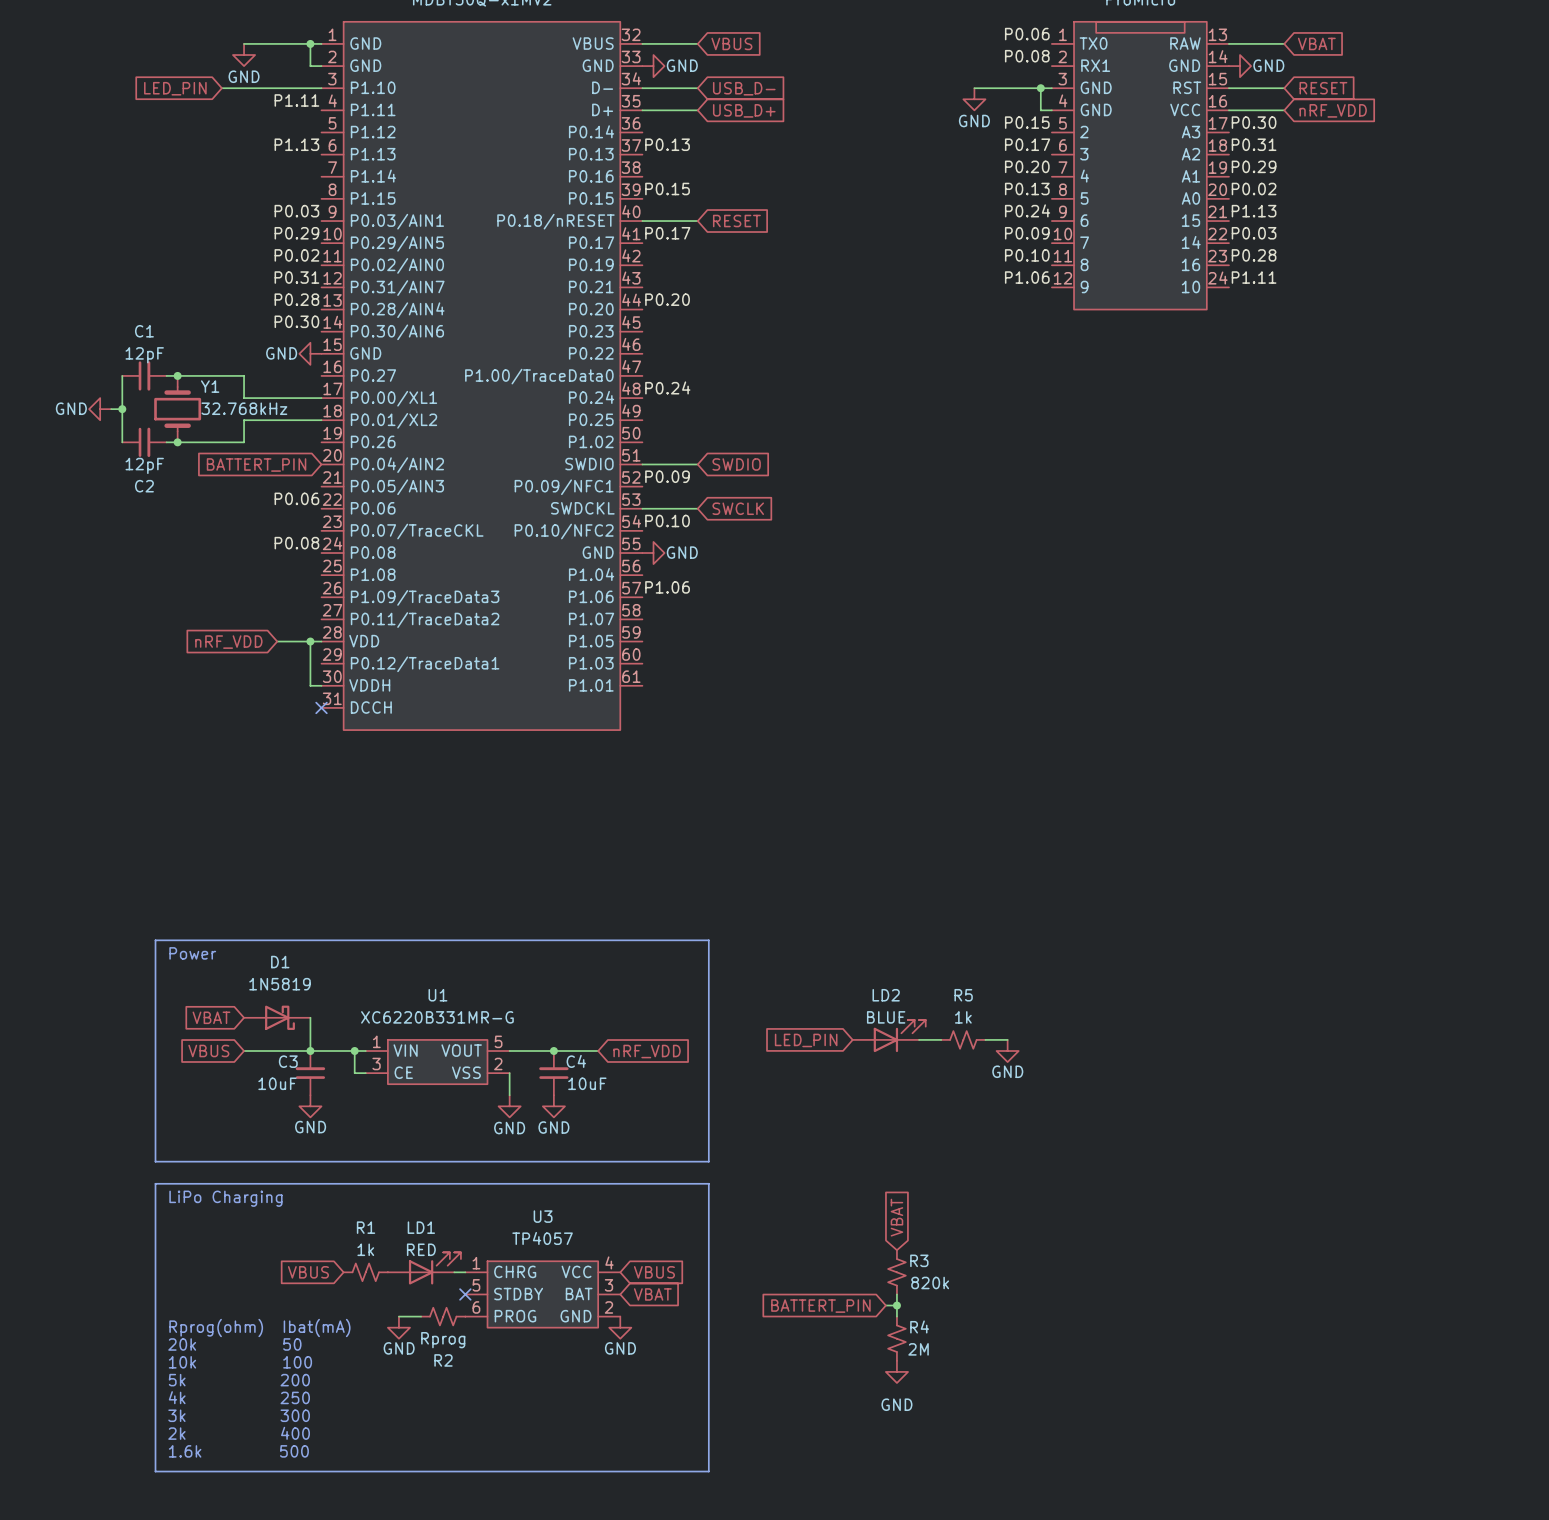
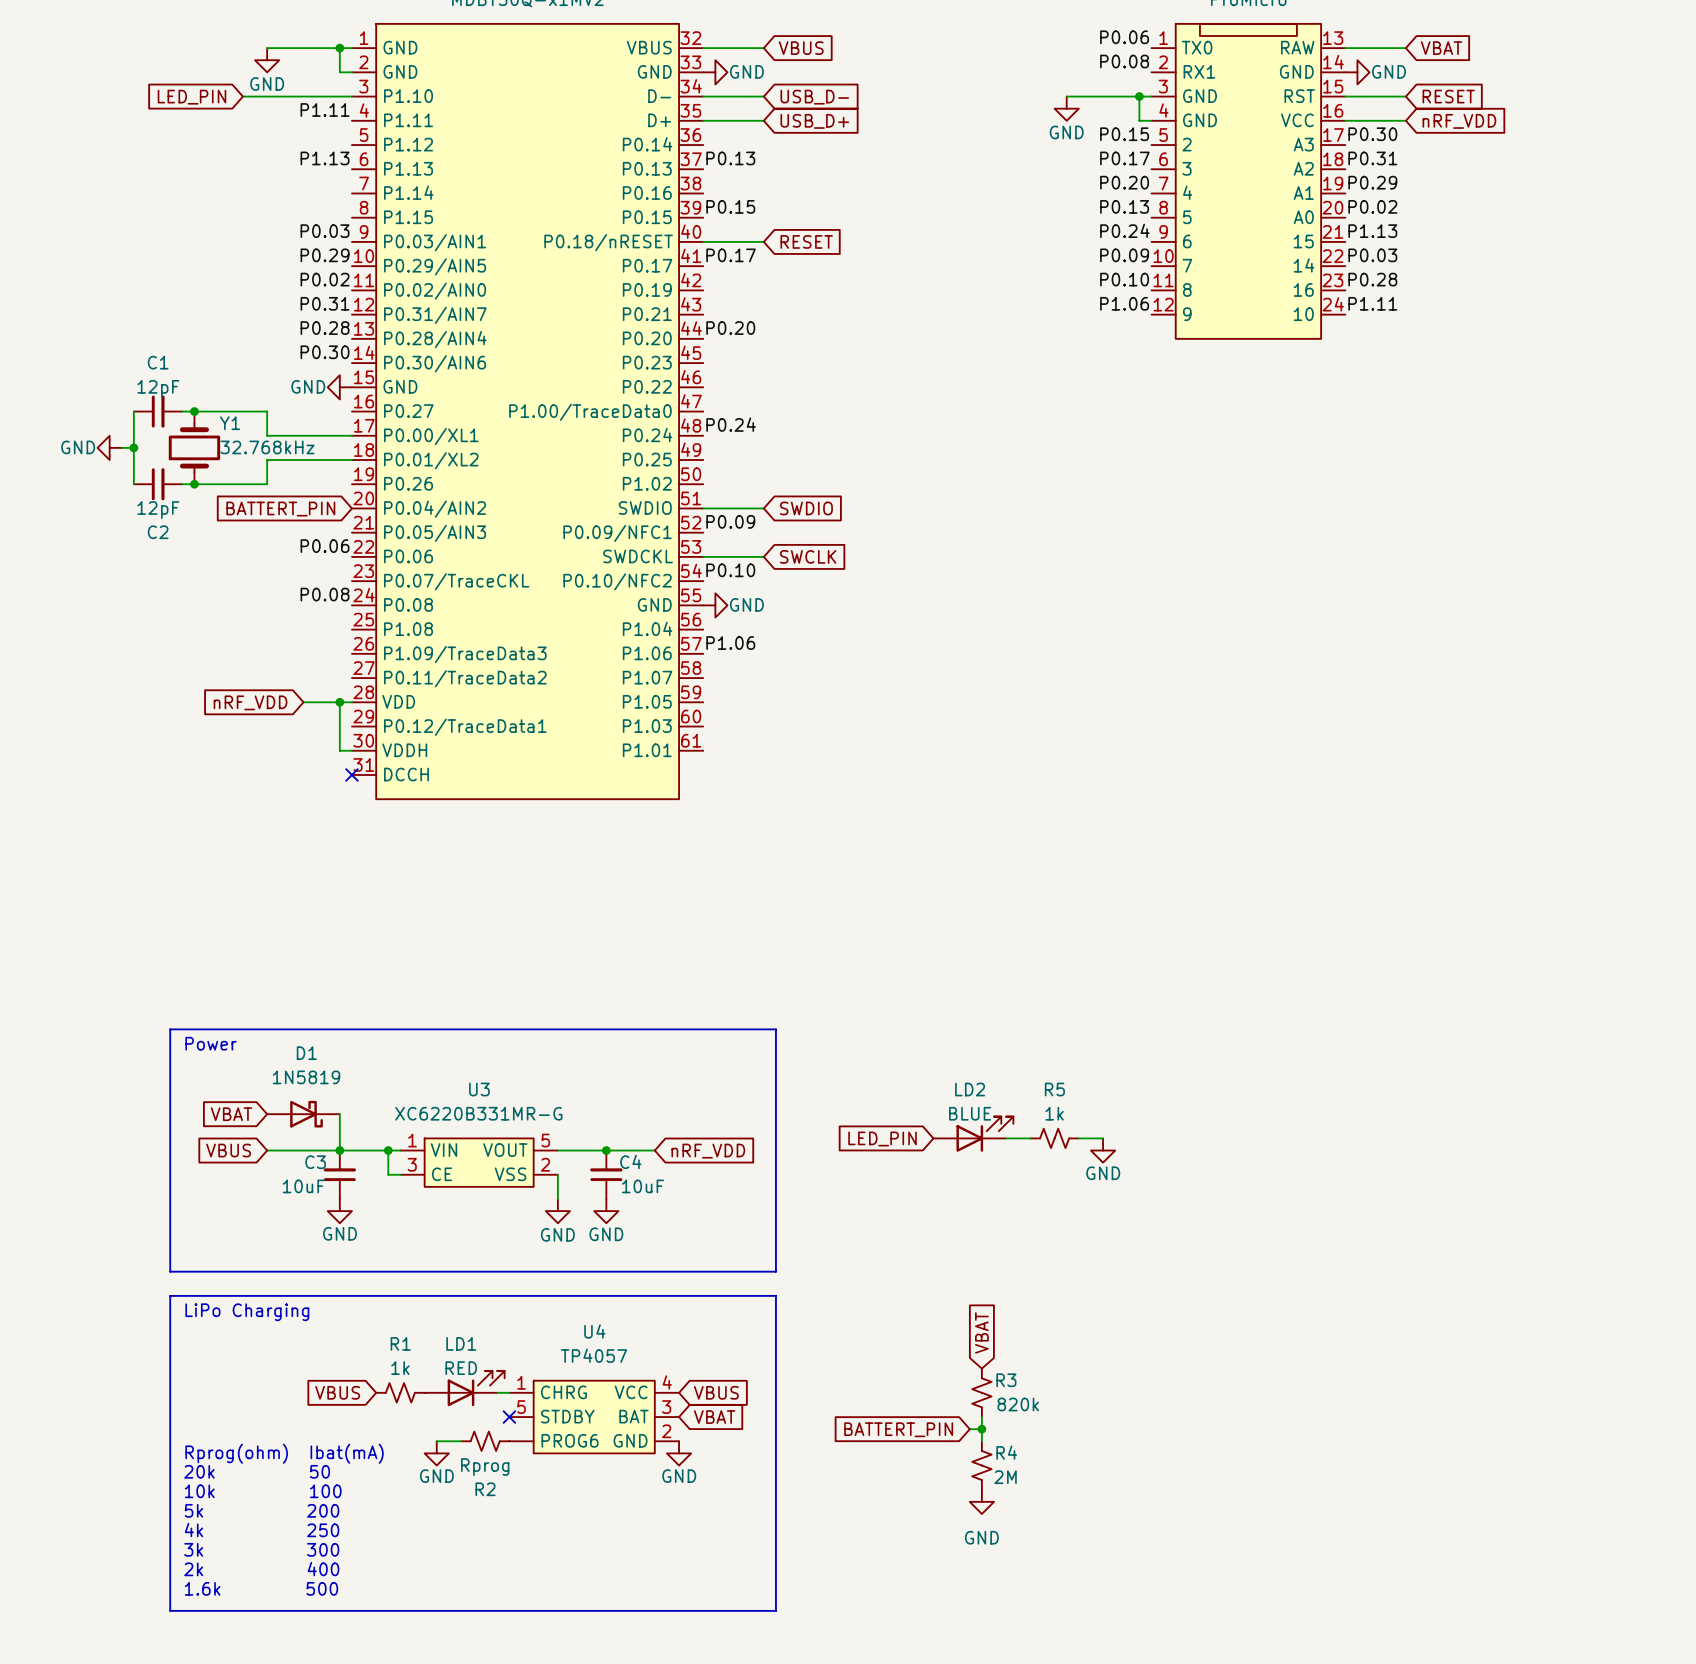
U1 name: U1 (437, 995) -> U3 (479, 1089)
U3 name: U3 (543, 1216) -> U4 (594, 1331)
U3 pin number: 6 (476, 1307) -> none
U3 pin name: PROG (515, 1316) -> PROG6 (570, 1440)

